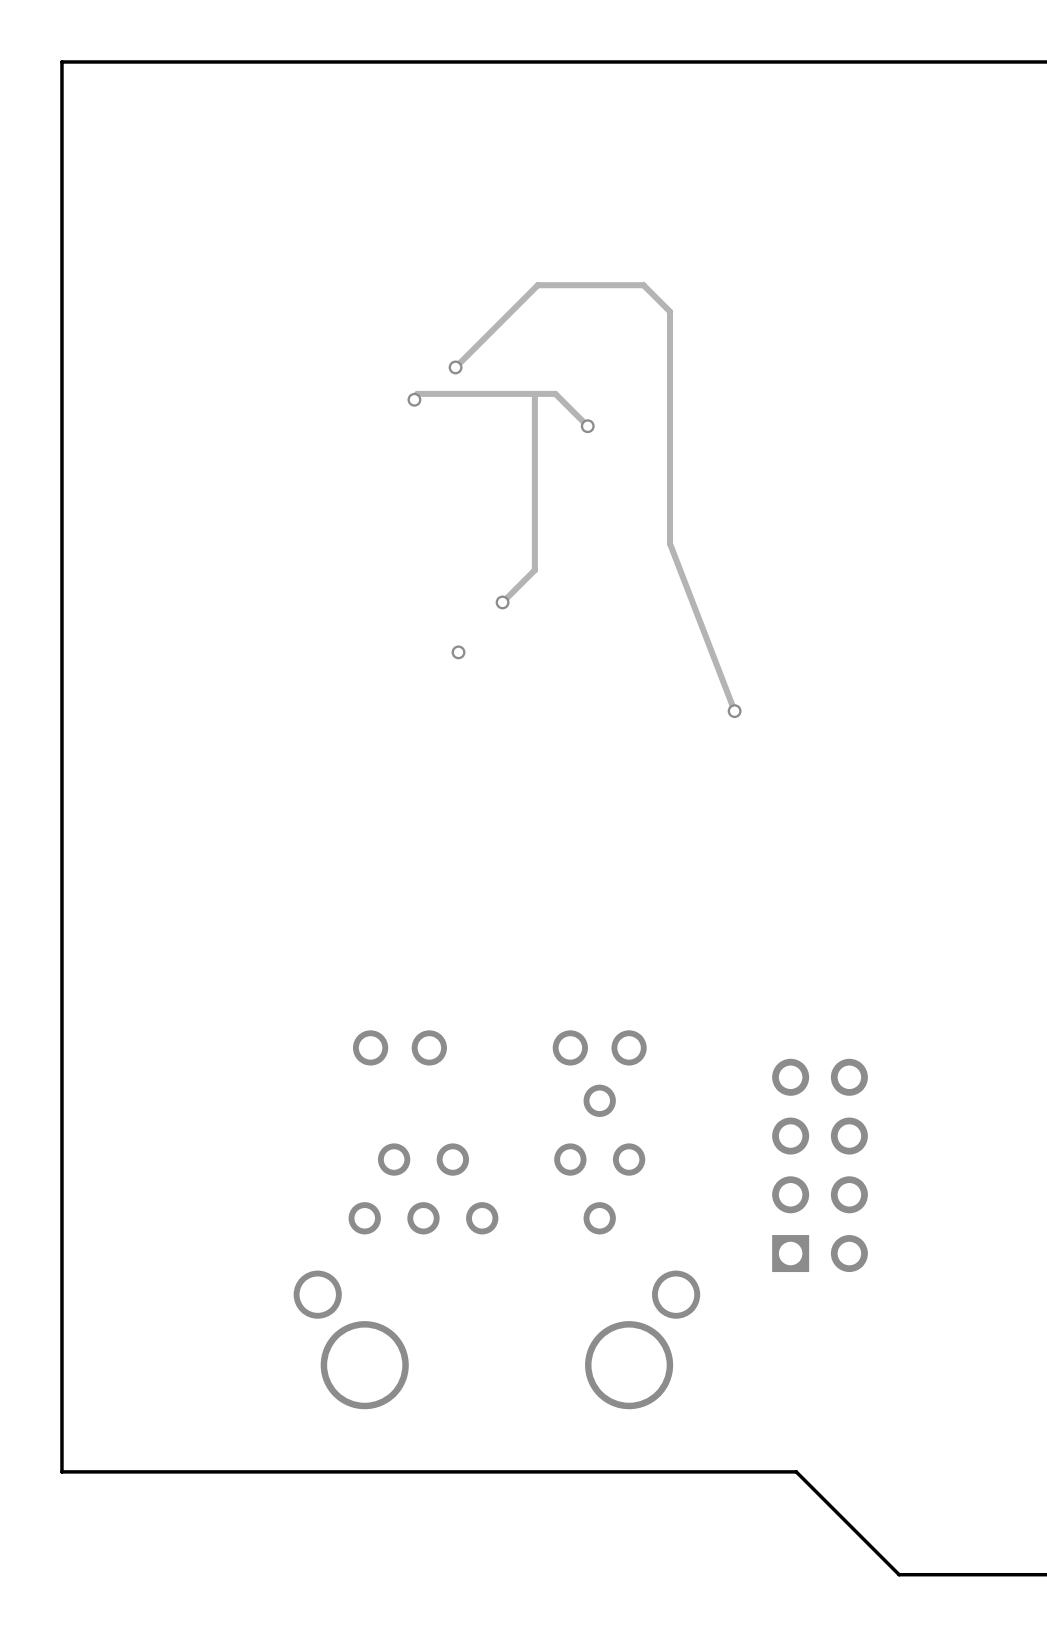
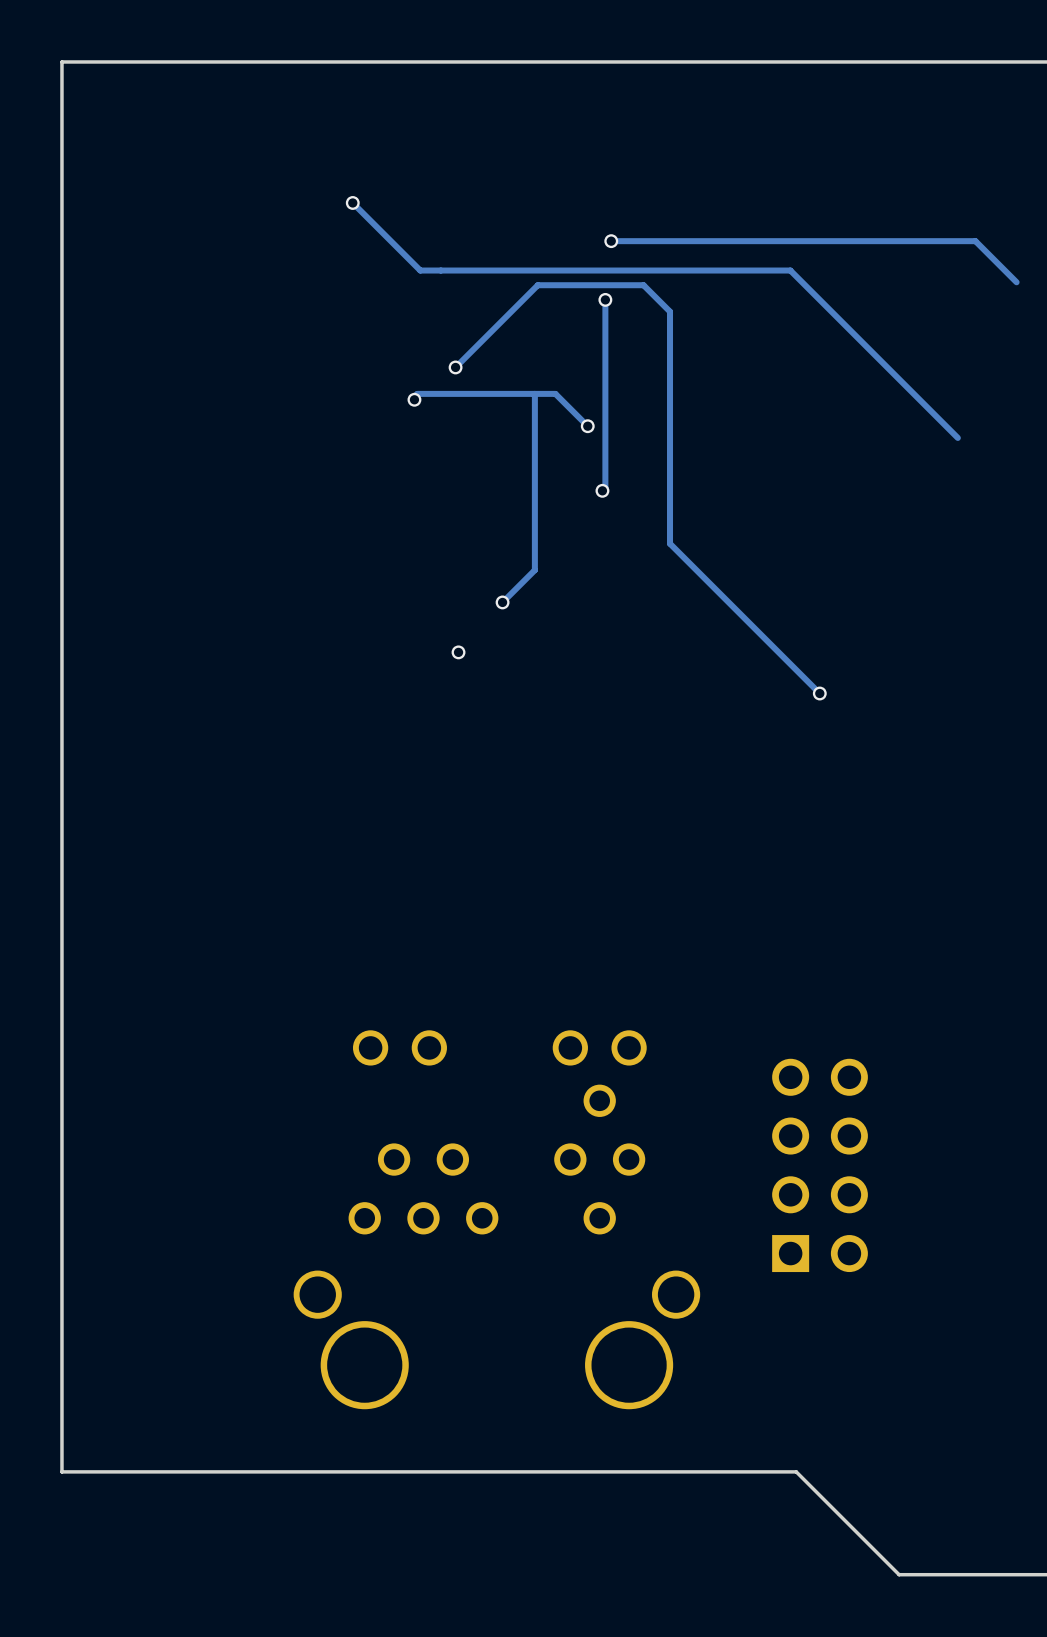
track: none -> (352, 202) (420, 270) (790, 270) (957, 437)
via: none -> (352, 202)
track: none -> (611, 241) (975, 241) (1016, 282)
via: none -> (611, 241)
track: none -> (605, 299) (605, 487) (602, 490)
via: none -> (605, 299)
via: none -> (602, 490)
track: (670, 543) (734, 711) -> (670, 543) (819, 693)
via position: (734, 711) -> (819, 693)

